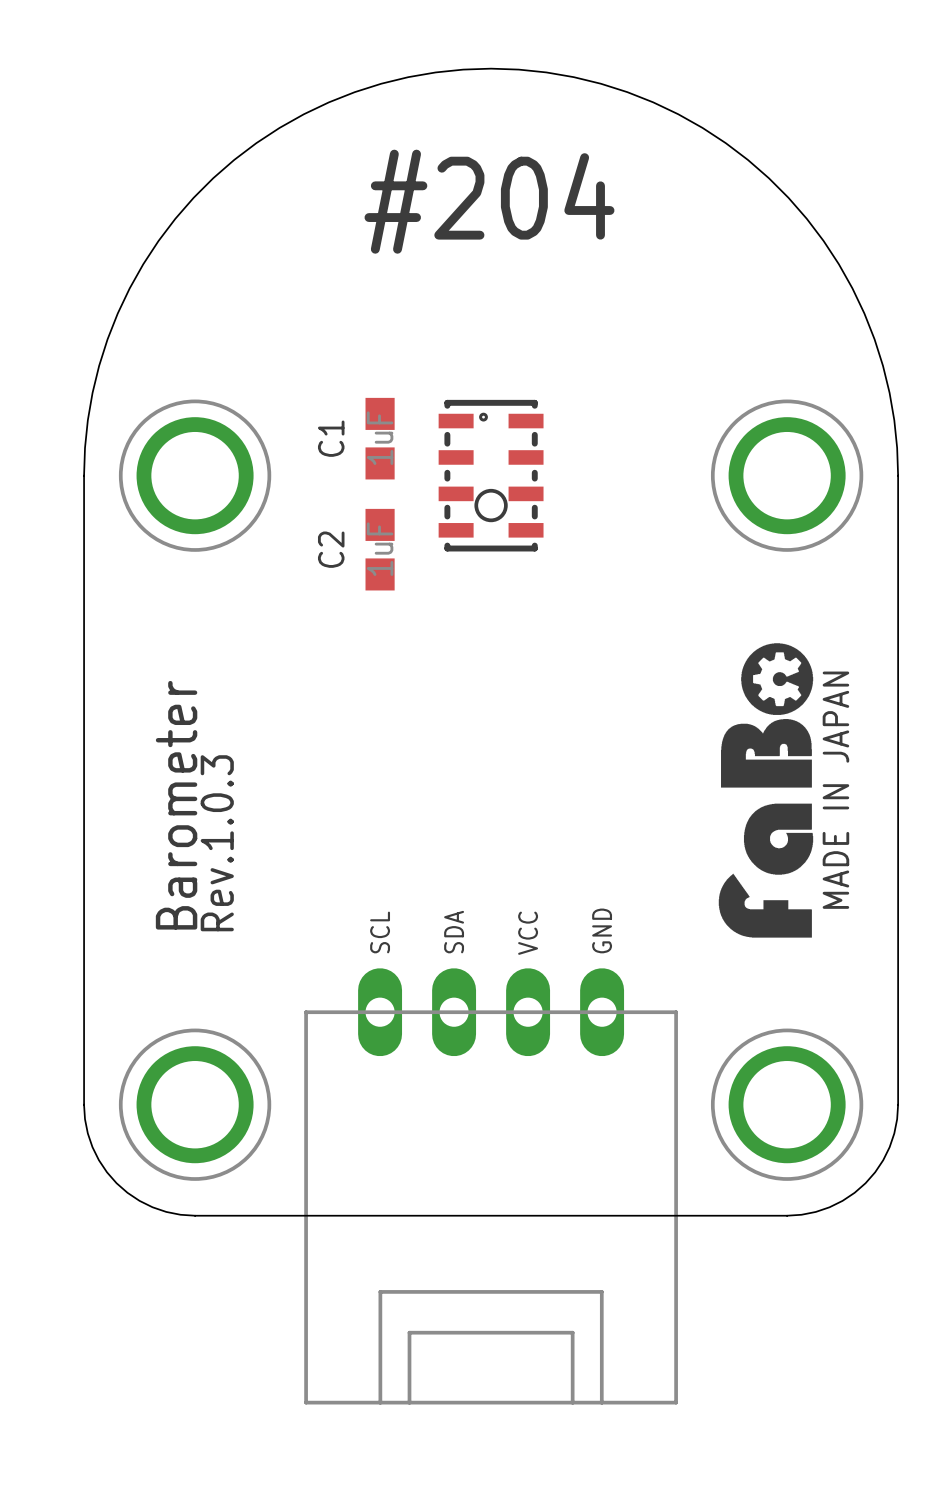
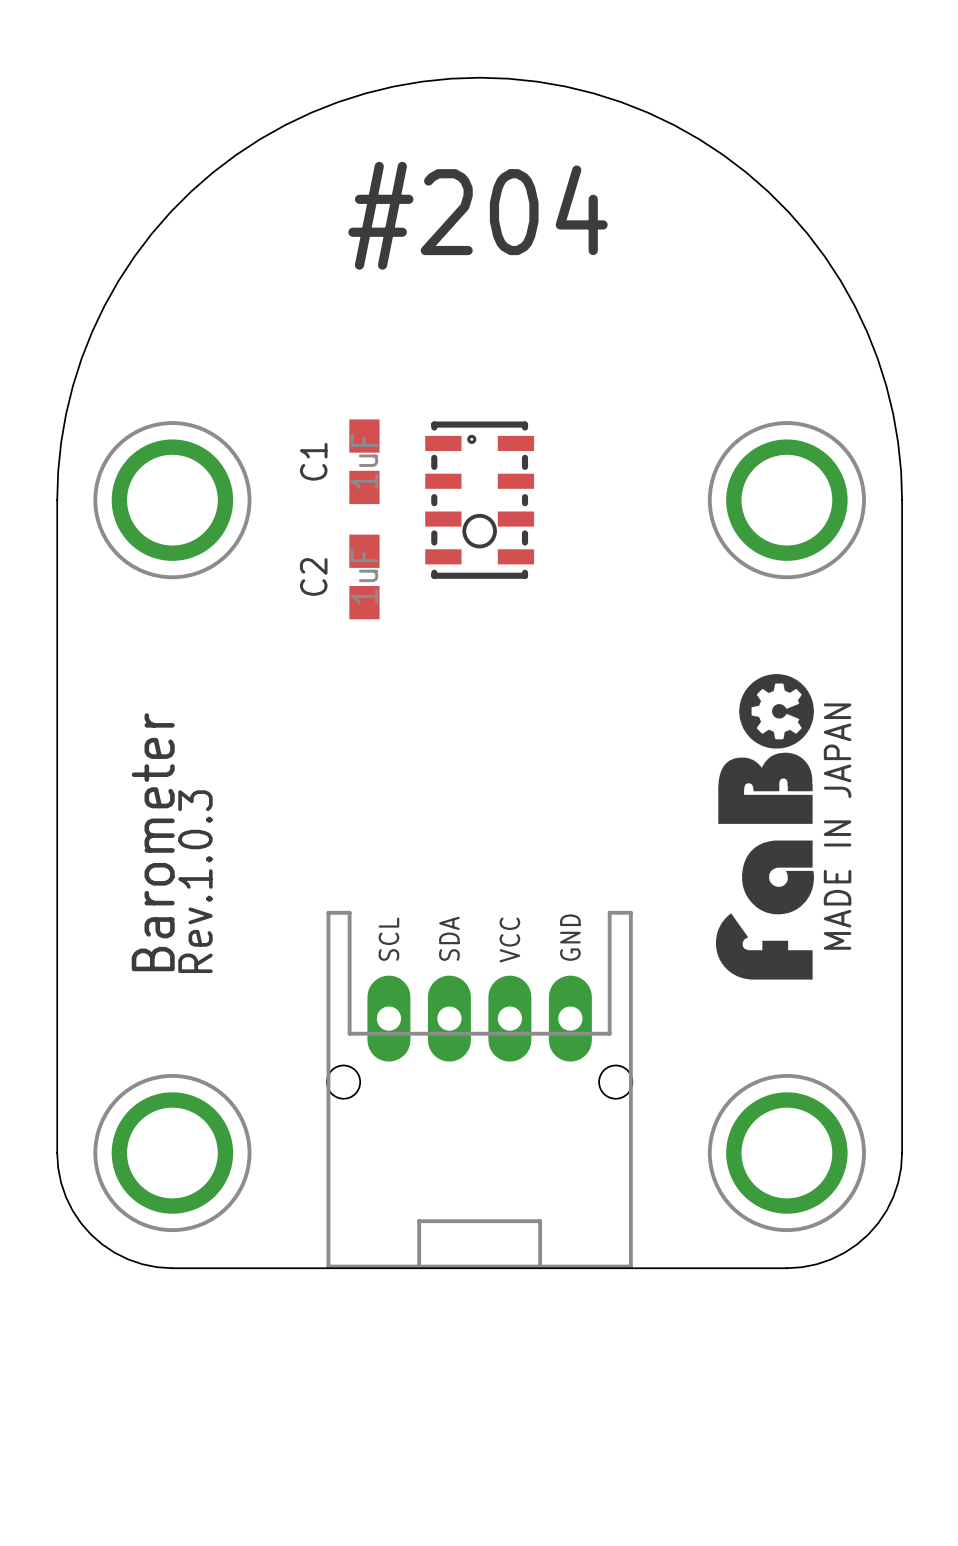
part: none -> (479, 673)
part: (491, 736) -> none

